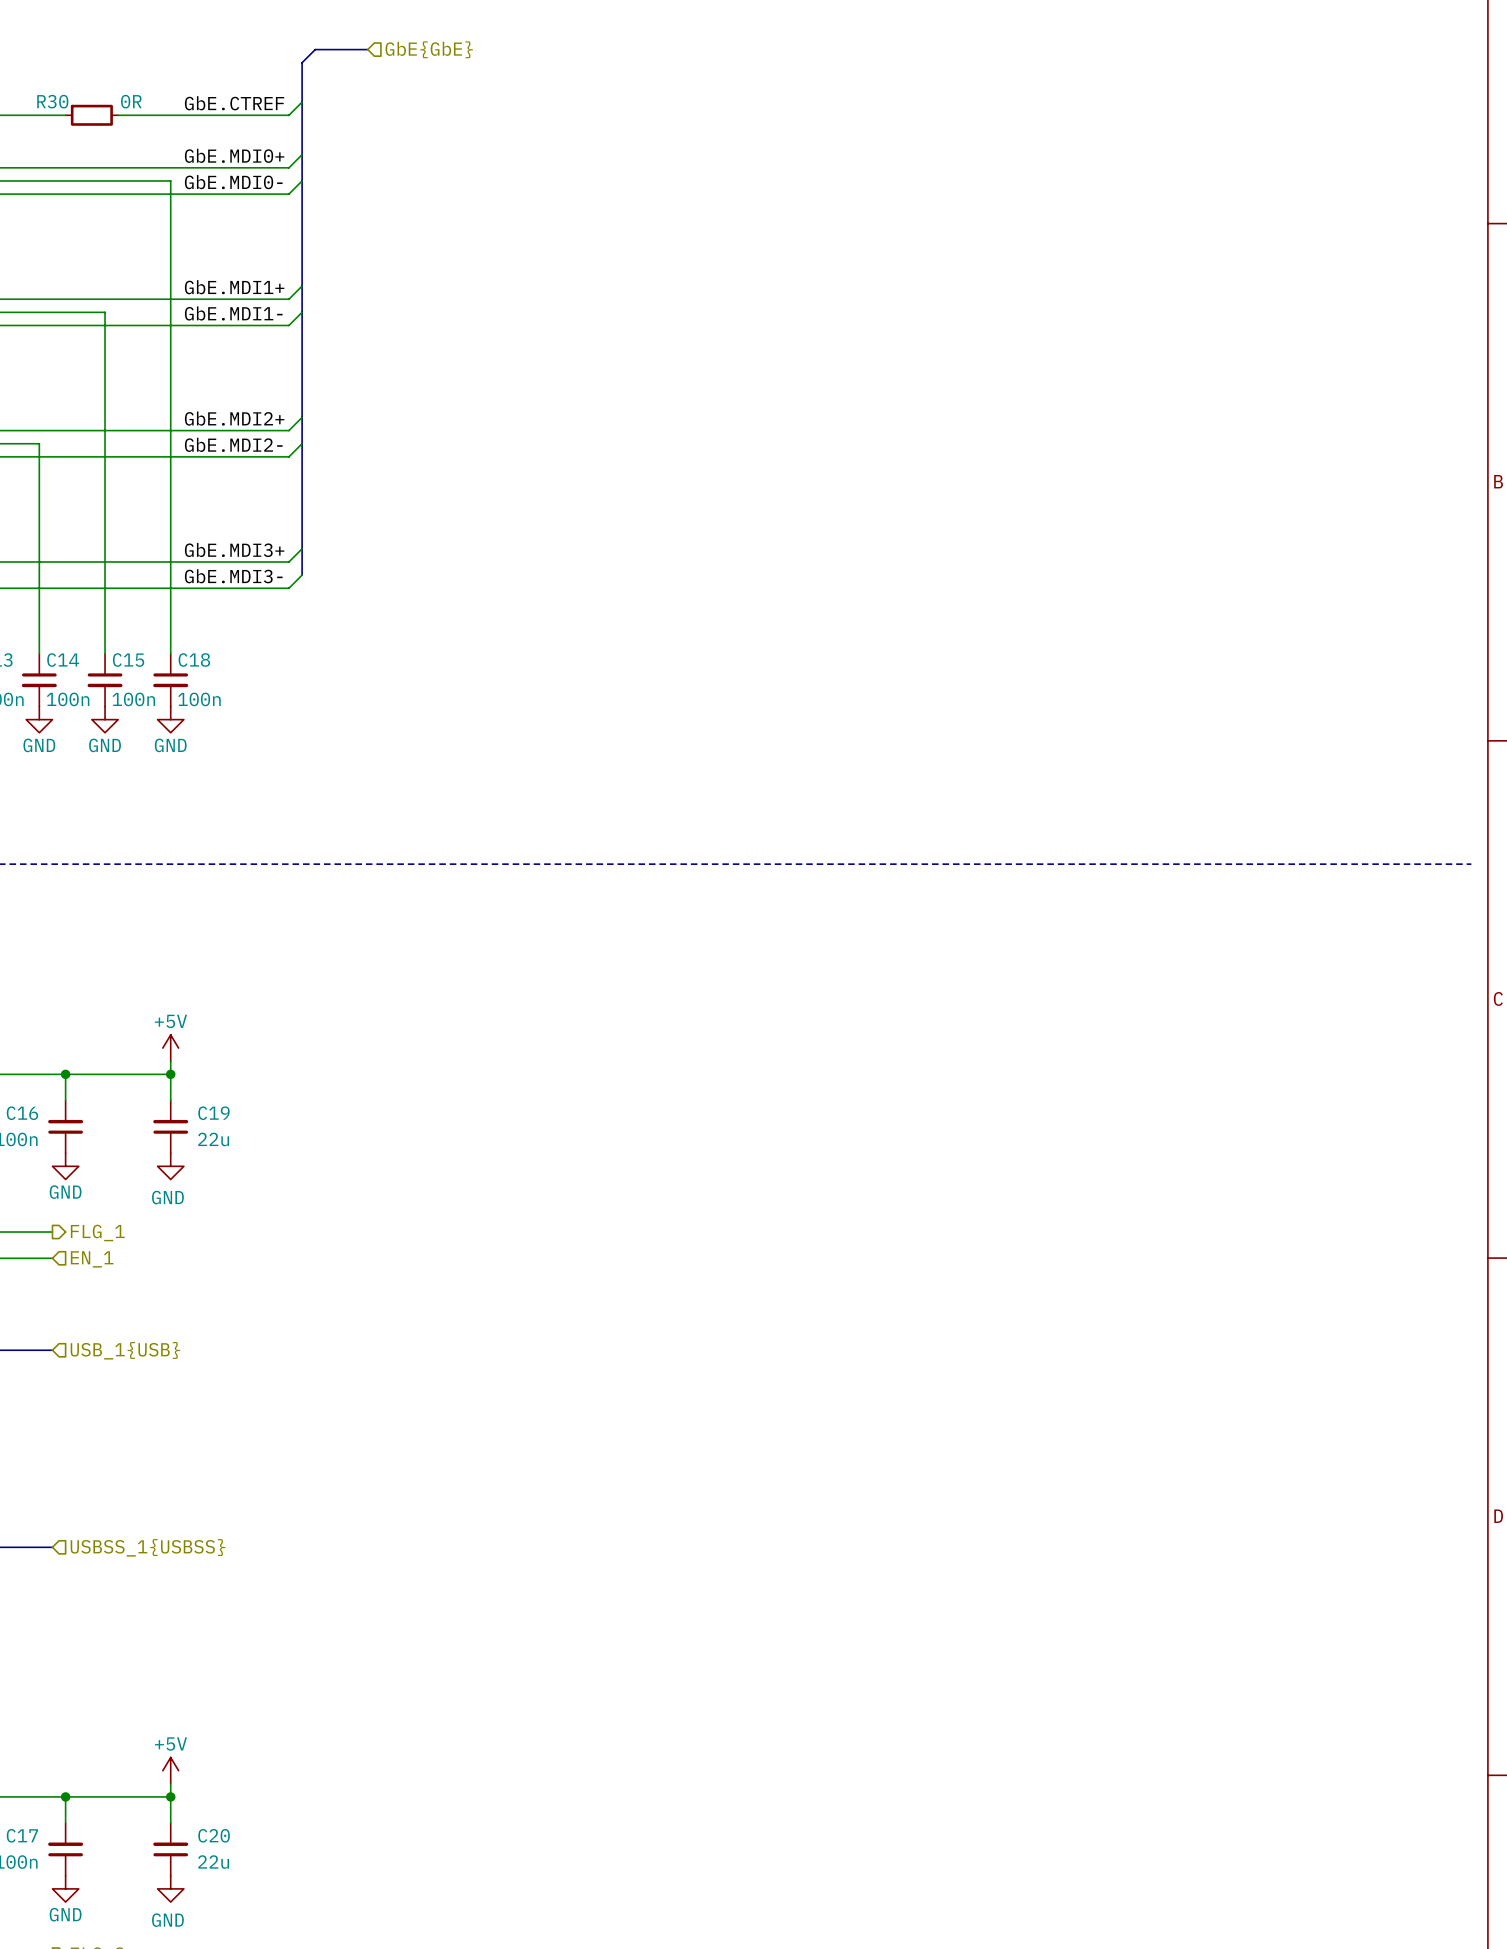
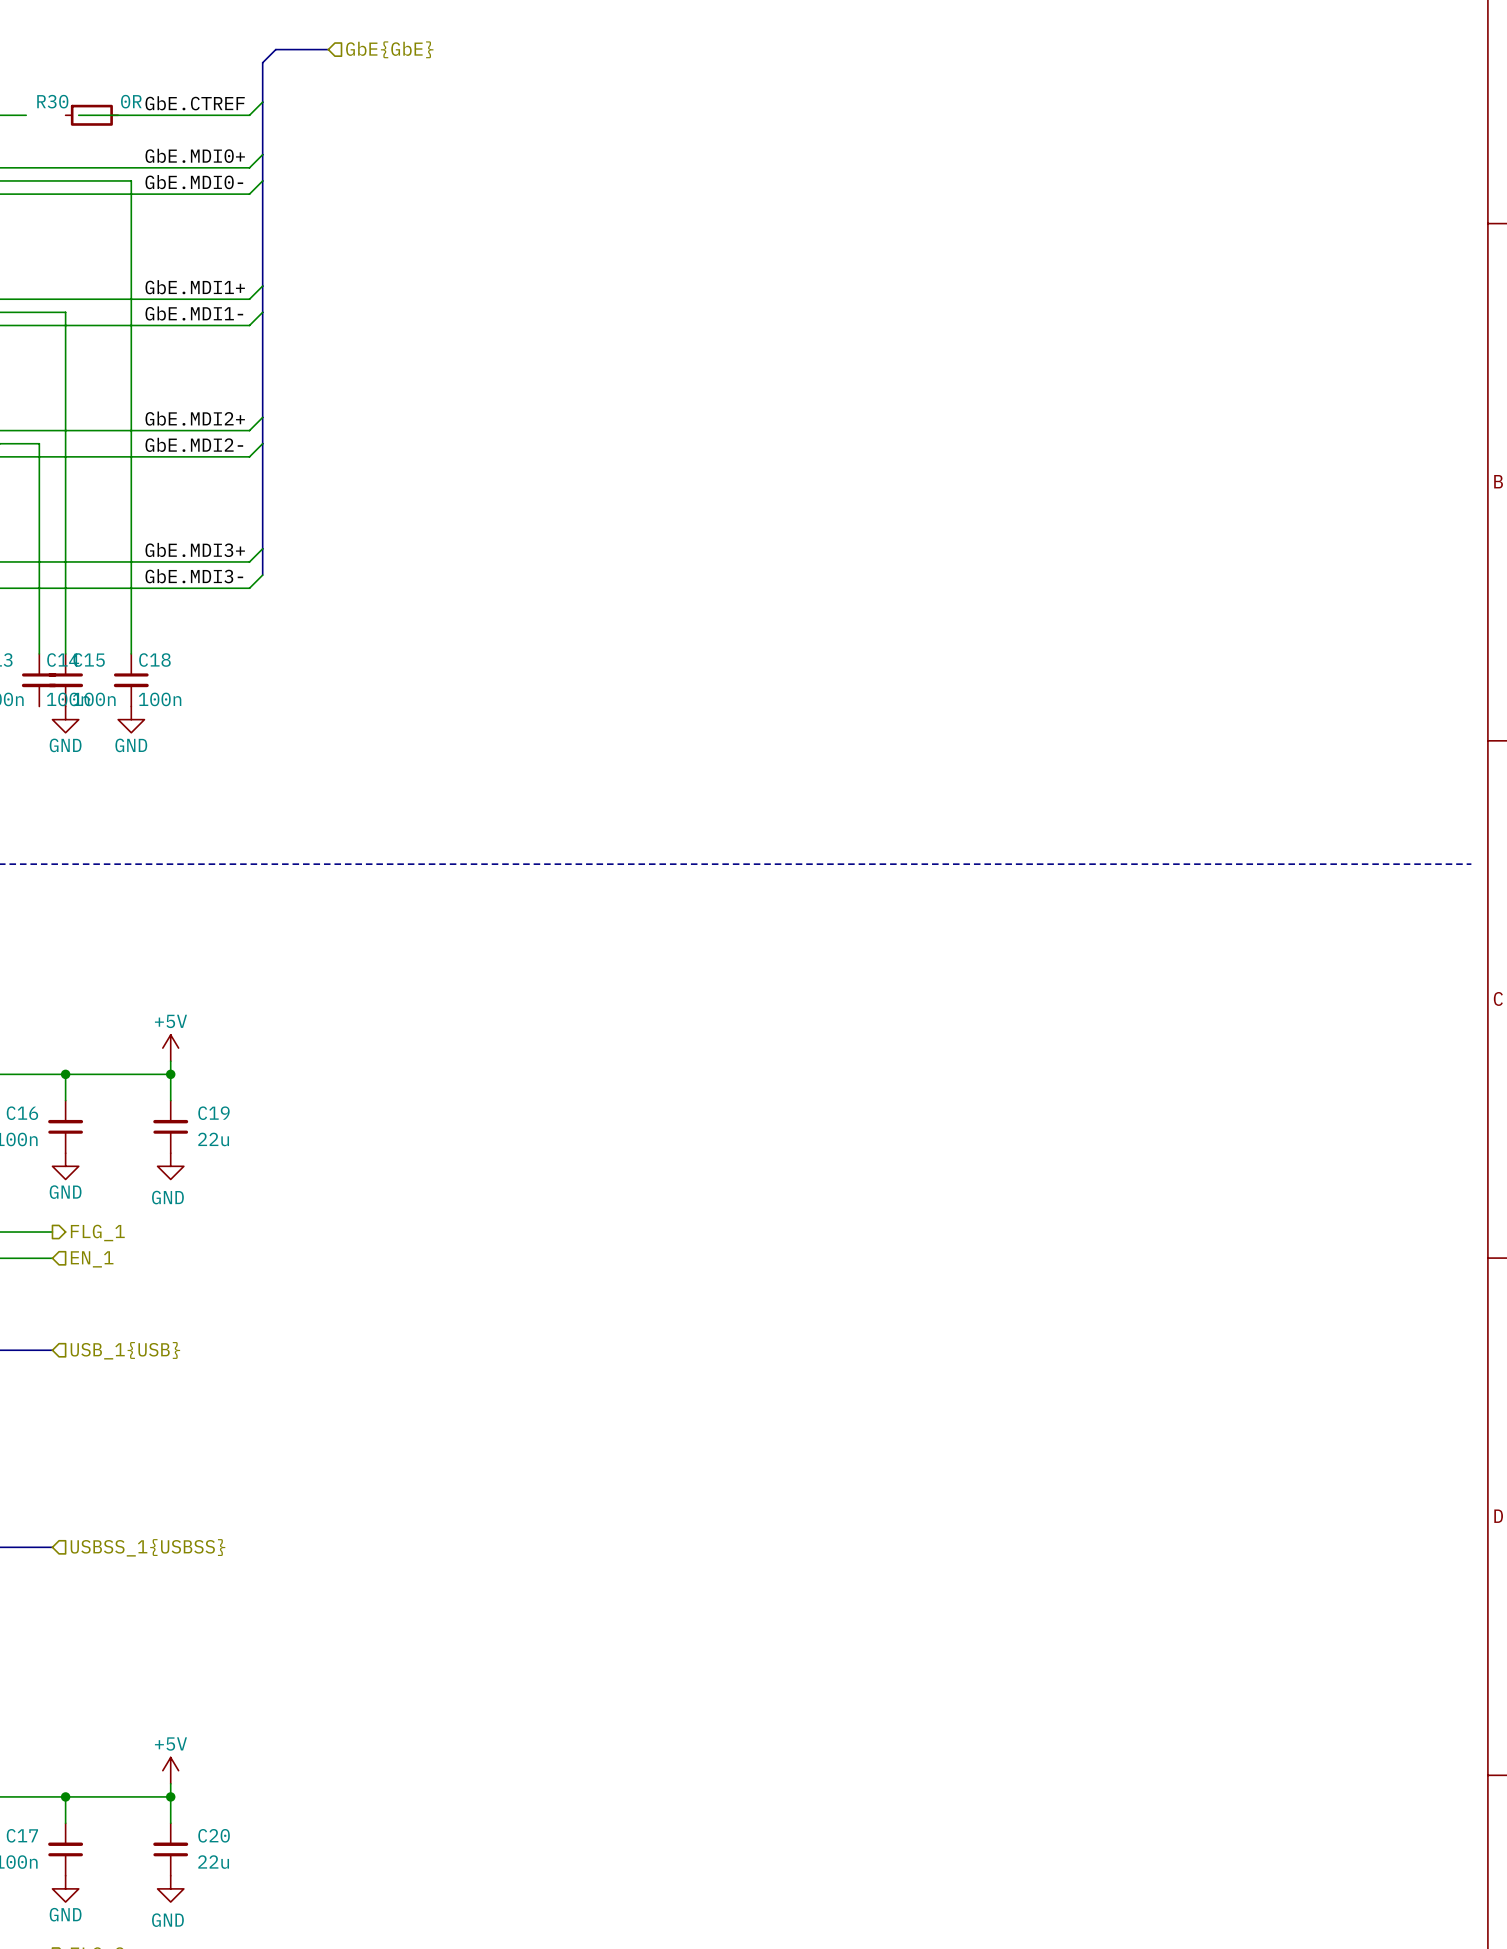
bus: (315, 49) (302, 62) (302, 575) -> (315, 49) (275, 49) (262, 62) (262, 575)
bus: (328, 49) (367, 49) -> none
hierarchical label position: GbE{GbE} (429, 49) -> GbE{GbE} (389, 49)
wire: (302, 102) (288, 115) (249, 115) -> (262, 102) (249, 115)
label position: GbE.CTREF (234, 103) -> GbE.CTREF (195, 103)
wire: (26, 115) (65, 115) -> (78, 115) (118, 115)
wire: (302, 154) (288, 167) (249, 167) -> (262, 154) (249, 167)
label position: GbE.MDI0+ (234, 155) -> GbE.MDI0+ (195, 155)
wire: (131, 180) (170, 180) (170, 653) -> (131, 180) (131, 653)
wire: (302, 180) (288, 194) (249, 194) -> (262, 180) (249, 194)
label position: GbE.MDI0- (233, 182) -> GbE.MDI0- (194, 182)
wire: (302, 286) (288, 299) (249, 299) -> (262, 286) (249, 299)
label position: GbE.MDI1+ (234, 287) -> GbE.MDI1+ (195, 287)
wire: (65, 312) (105, 312) (105, 653) -> (65, 312) (65, 653)
wire: (302, 312) (288, 325) (249, 325) -> (262, 312) (249, 325)
label position: GbE.MDI1- (233, 313) -> GbE.MDI1- (194, 313)
wire: (302, 417) (288, 430) (249, 430) -> (262, 417) (249, 430)
label position: GbE.MDI2+ (234, 418) -> GbE.MDI2+ (195, 418)
wire: (302, 443) (288, 456) (249, 456) -> (262, 443) (249, 456)
label position: GbE.MDI2- (233, 444) -> GbE.MDI2- (194, 444)
wire: (302, 548) (288, 561) (249, 561) -> (262, 548) (249, 561)
label position: GbE.MDI3+ (234, 549) -> GbE.MDI3+ (195, 549)
wire: (302, 575) (288, 588) (249, 588) -> (262, 575) (249, 588)
label position: GbE.MDI3- (233, 576) -> GbE.MDI3- (194, 576)
C15 position: (105, 680) -> (65, 680)
C18 position: (170, 680) -> (131, 680)
power symbol: GND (39, 719) -> none
power symbol: none -> GND (65, 719)
power symbol: GND (105, 719) -> none
power symbol: none -> GND (131, 719)
power symbol: GND (170, 719) -> none

